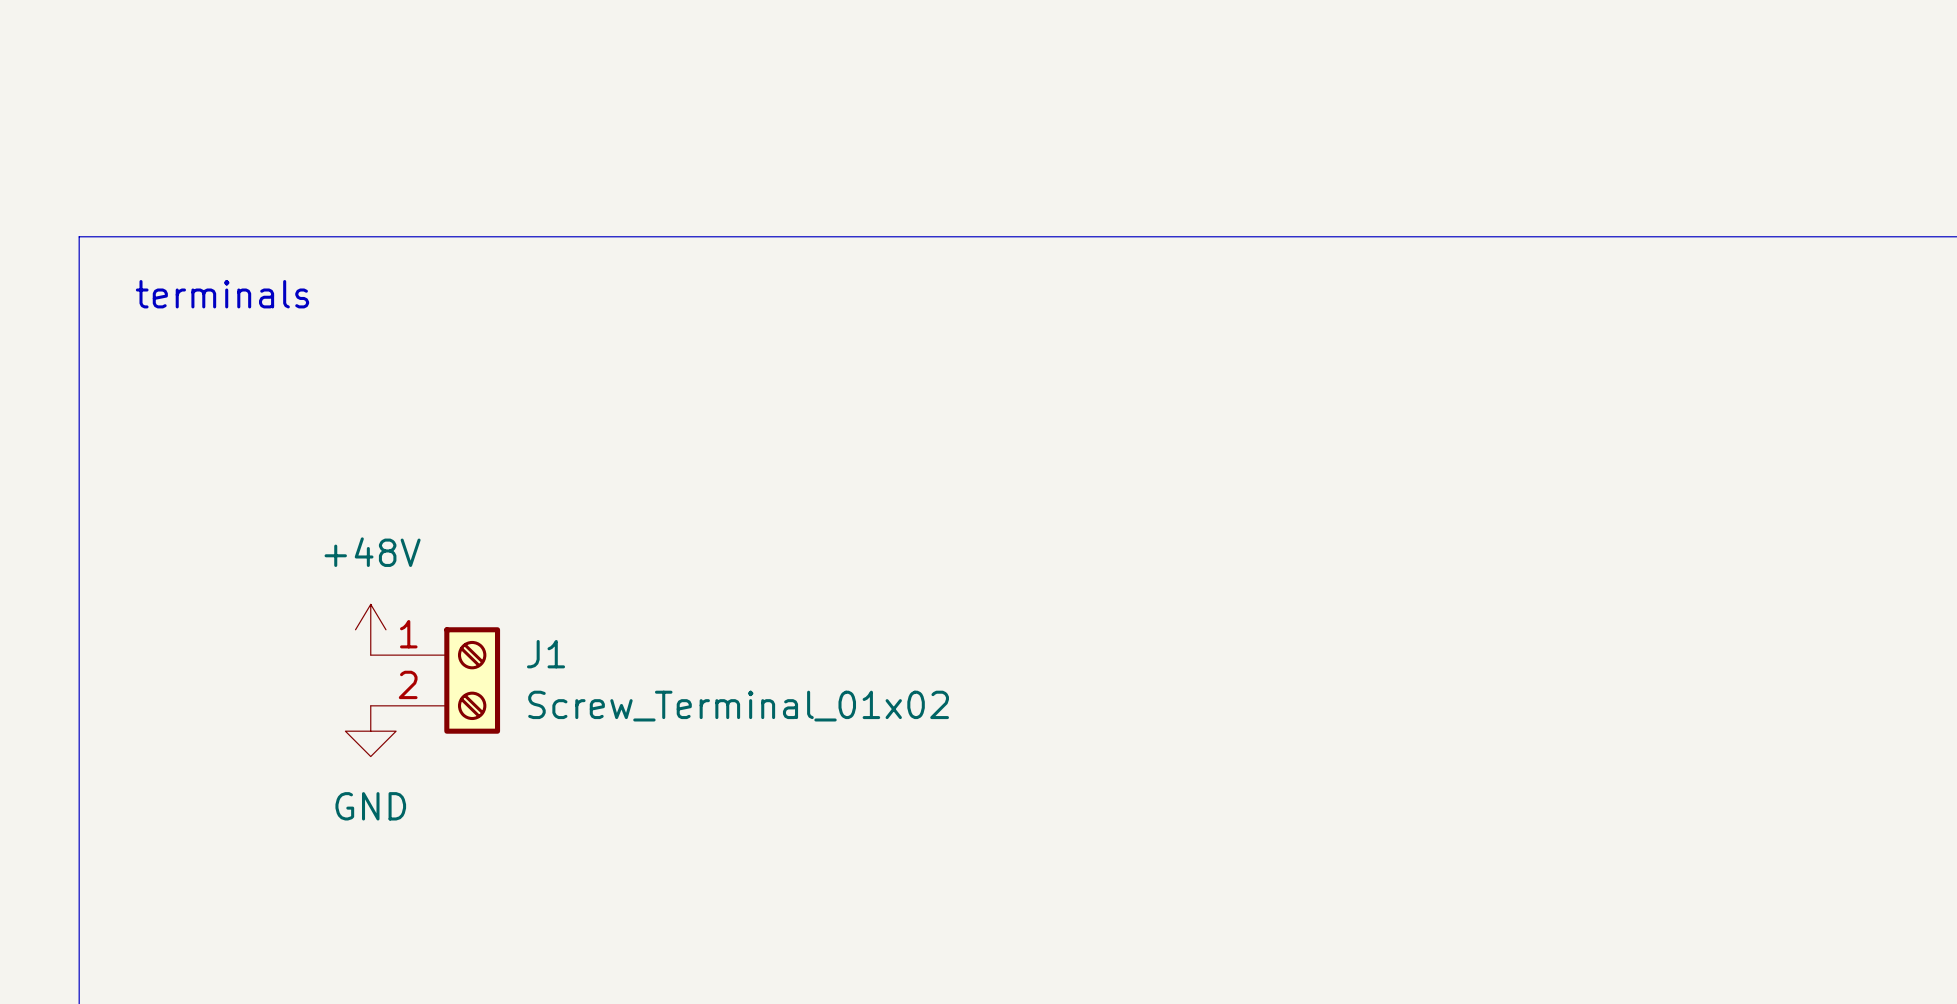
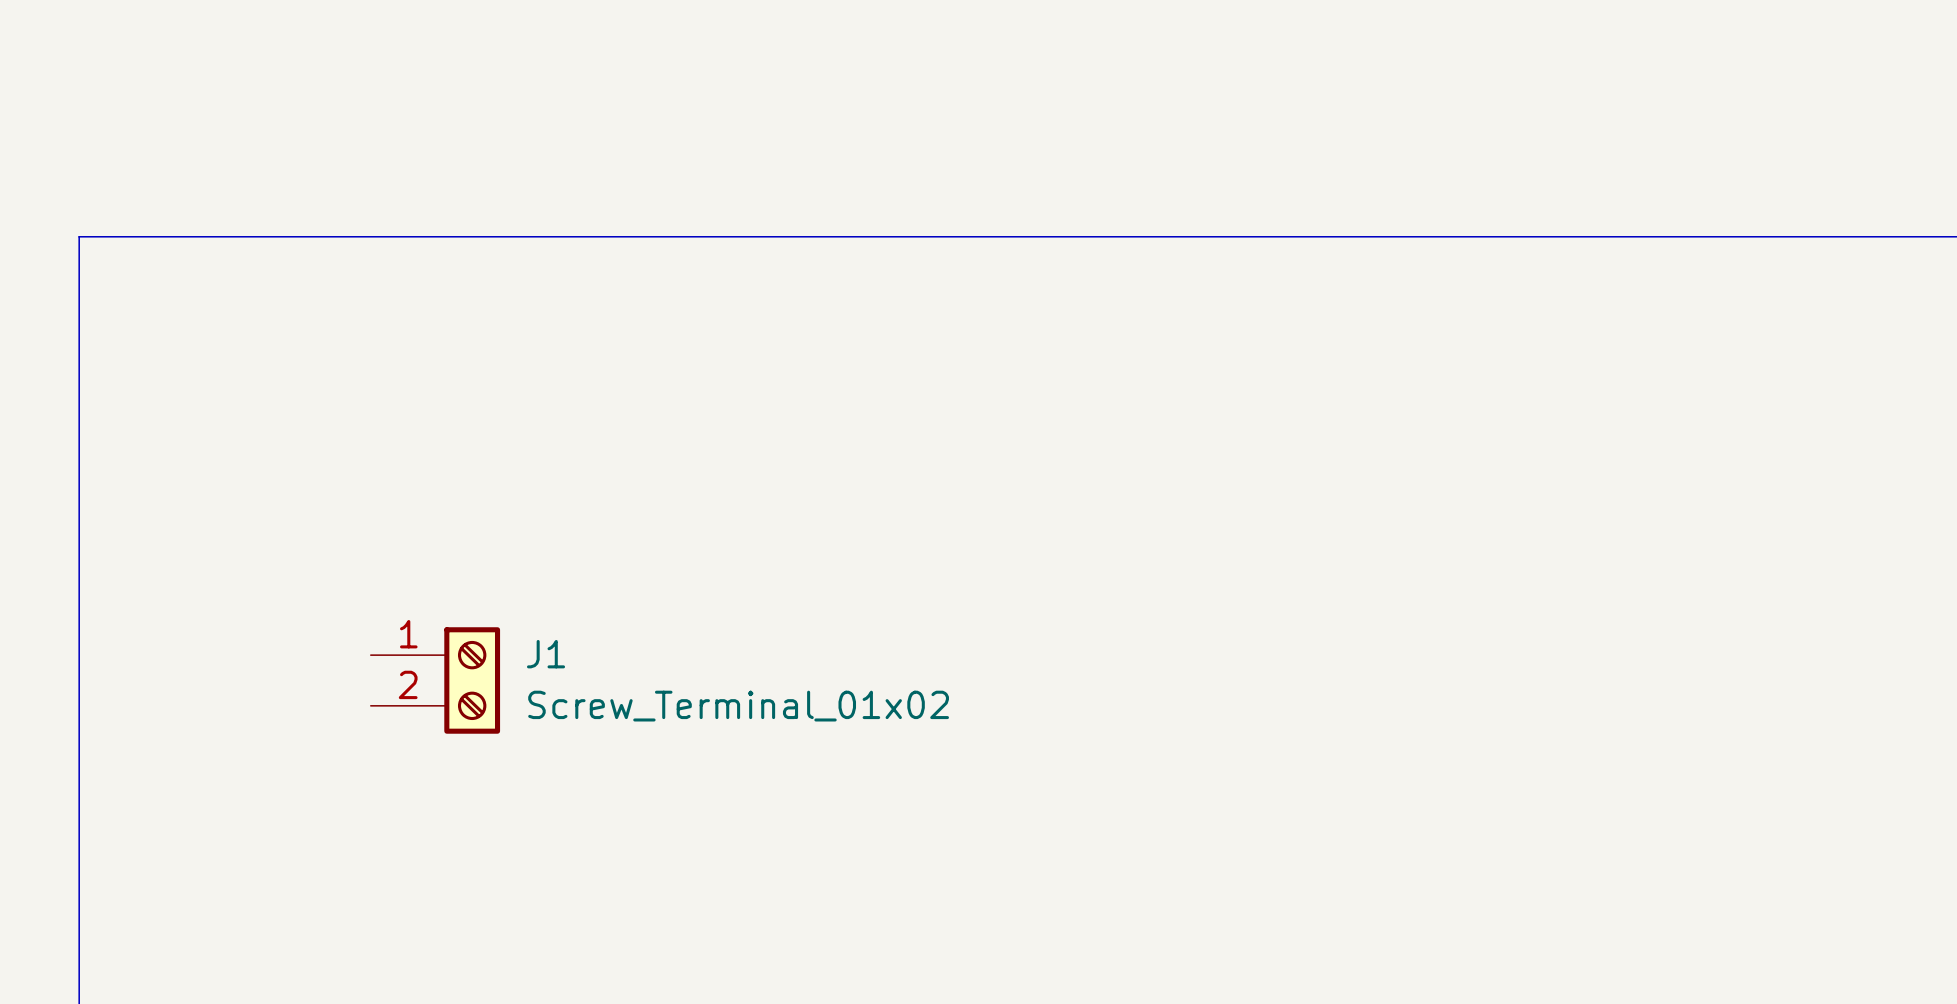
text: terminals (222, 294) -> none
power symbol: +48V (370, 629) -> none
power symbol: GND (370, 731) -> none

